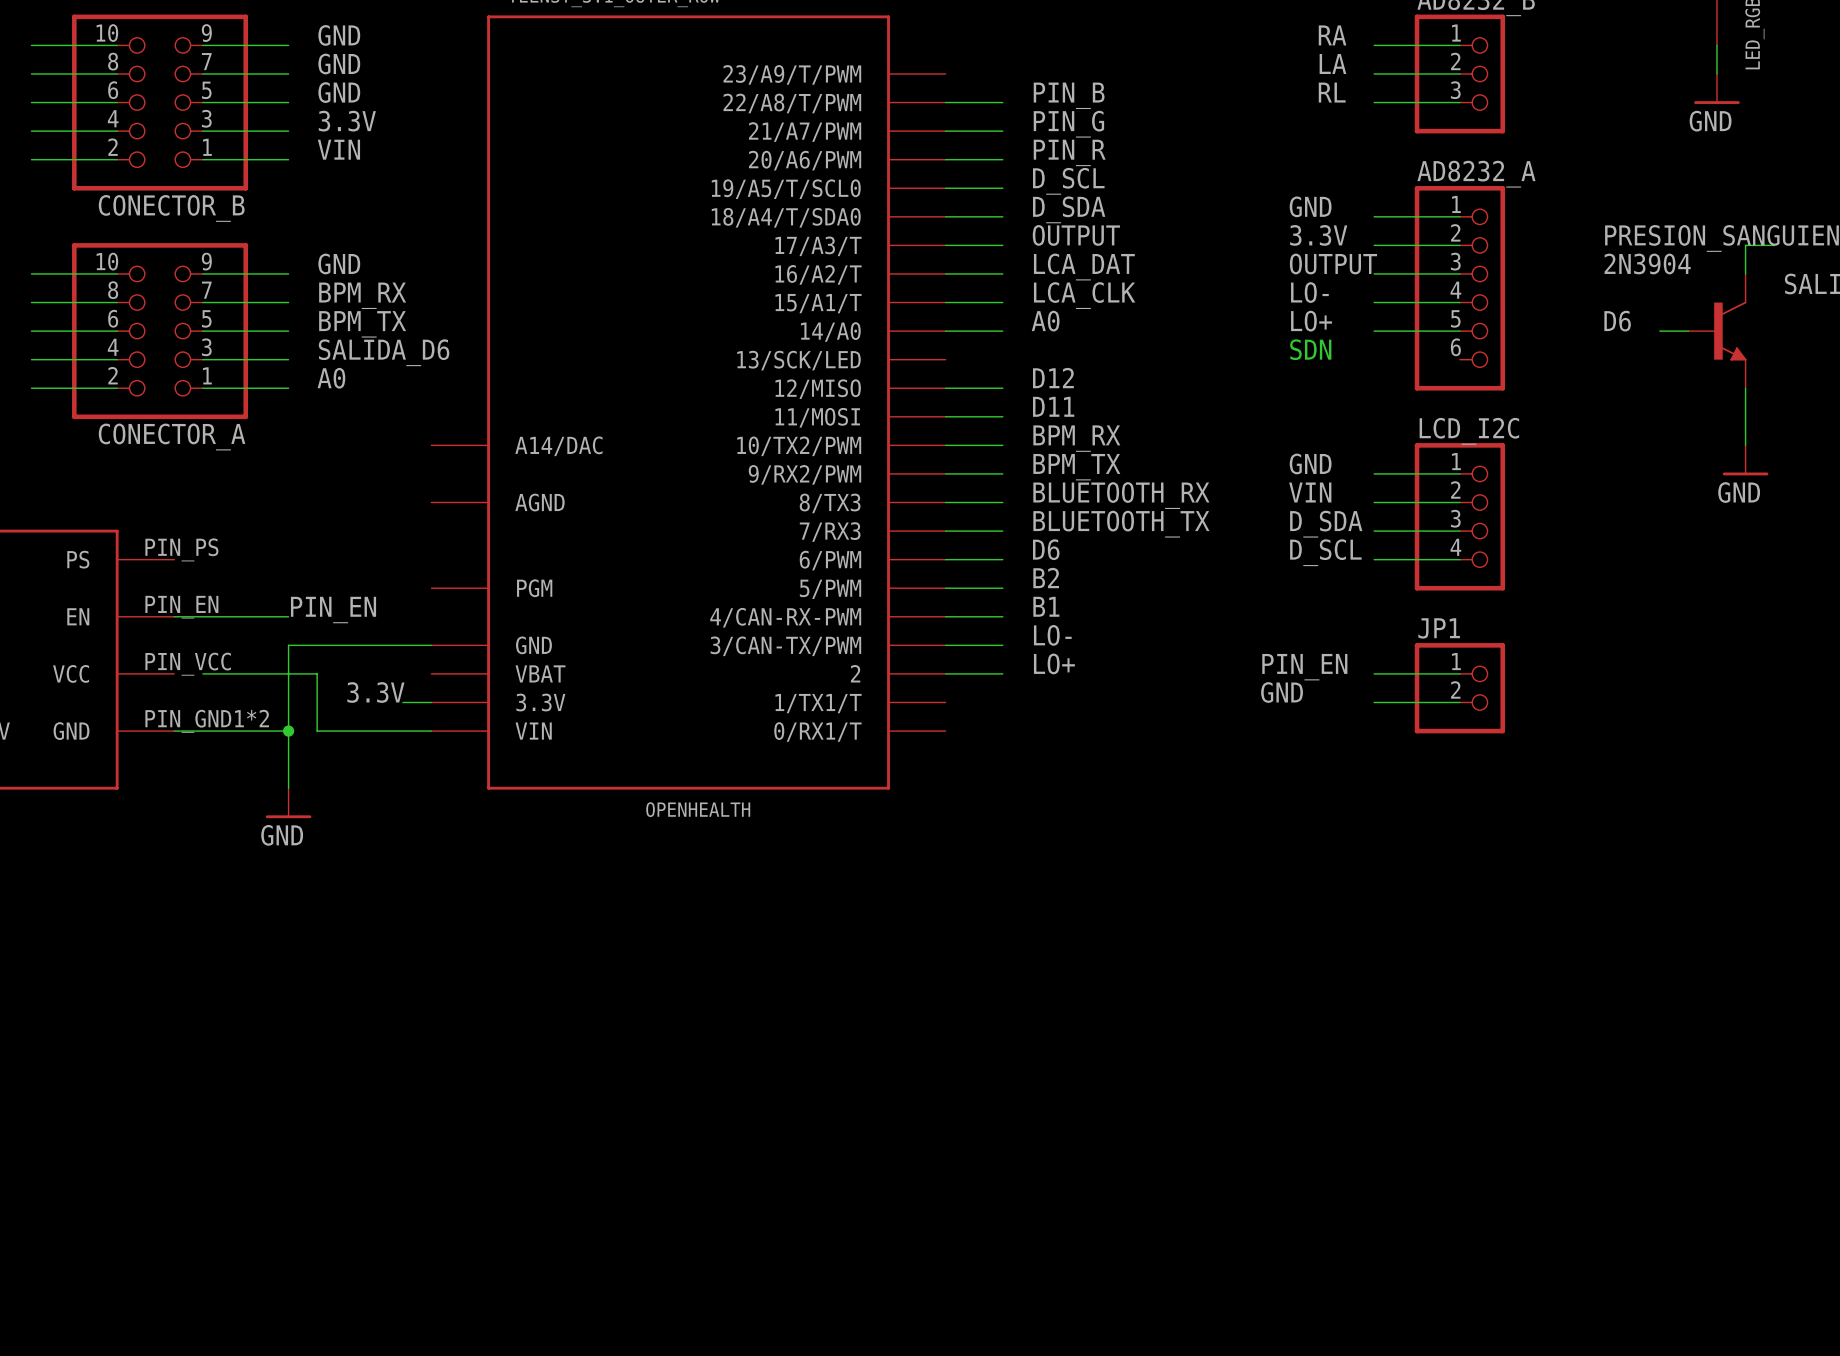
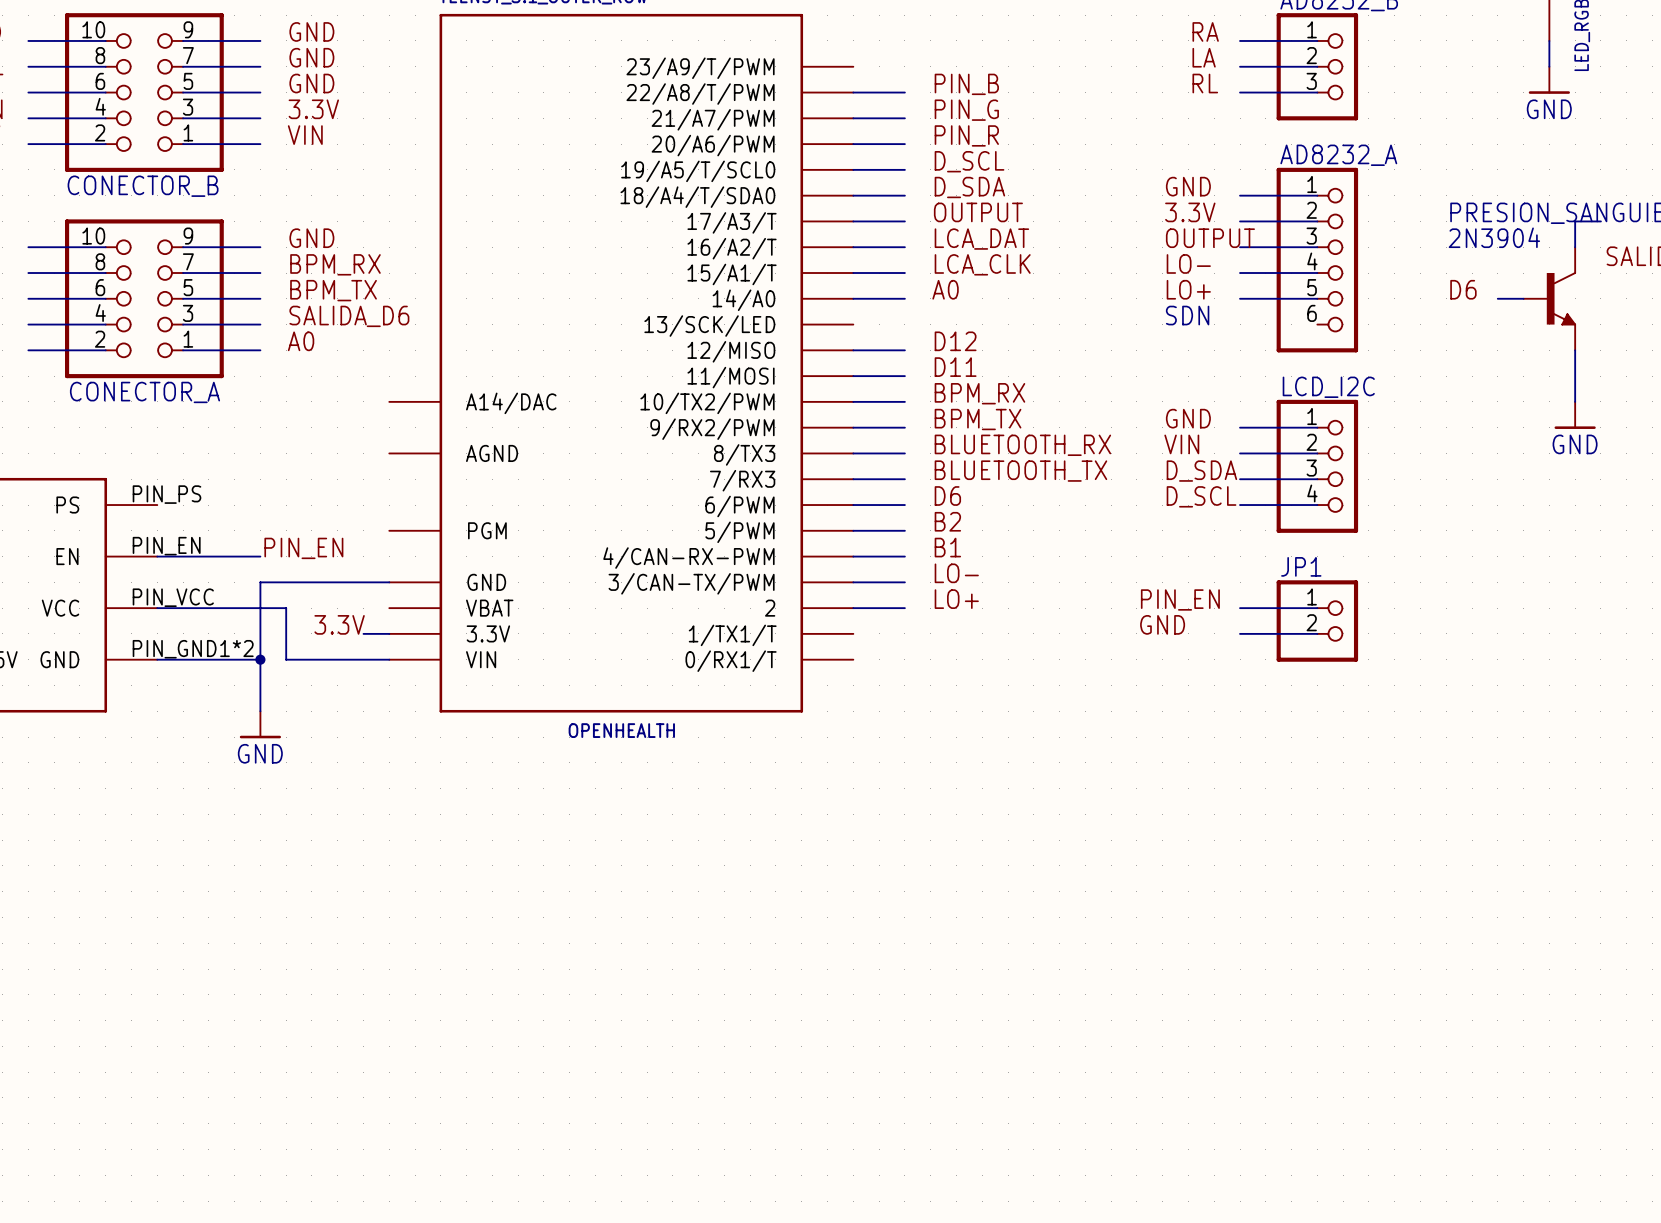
wire: none -> (157, 608) (183, 608)

